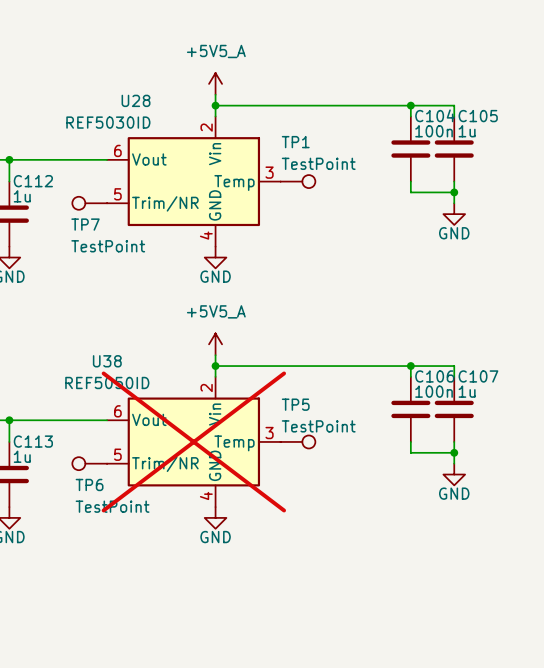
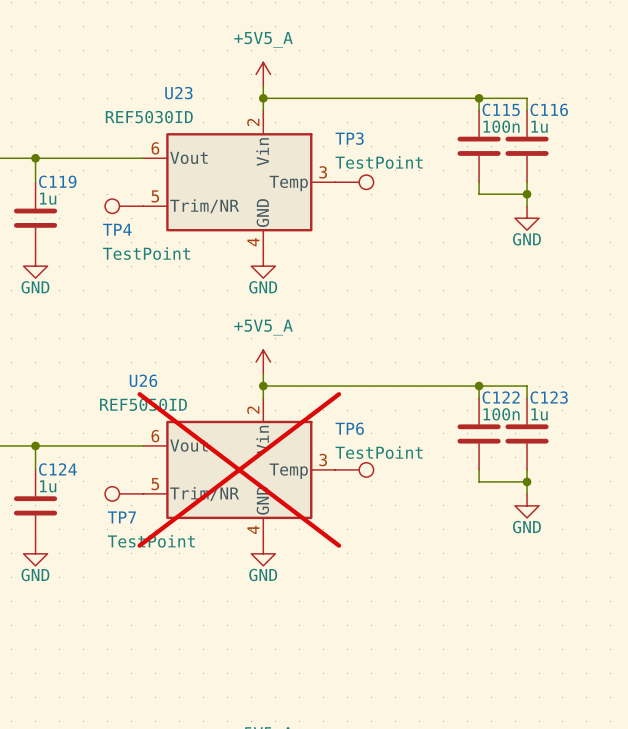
U28 name: U28 (136, 100) -> U23 (178, 93)
C104 name: C104 (435, 115) -> C115 (501, 109)
C105 name: C105 (478, 116) -> C116 (549, 109)
TP1 name: TP1 (295, 142) -> TP3 (349, 138)
C112 name: C112 (33, 181) -> C119 (57, 181)
TP7 name: TP7 (85, 224) -> TP4 (117, 229)
U38 name: U38 (107, 361) -> U26 (143, 380)
C106 name: C106 (434, 376) -> C122 (501, 397)
C107 name: C107 (478, 376) -> C123 (549, 397)
TP5 name: TP5 (295, 404) -> TP6 (349, 428)
C113 name: C113 (33, 441) -> C124 (57, 469)
TP6 name: TP6 (89, 484) -> TP7 (121, 517)

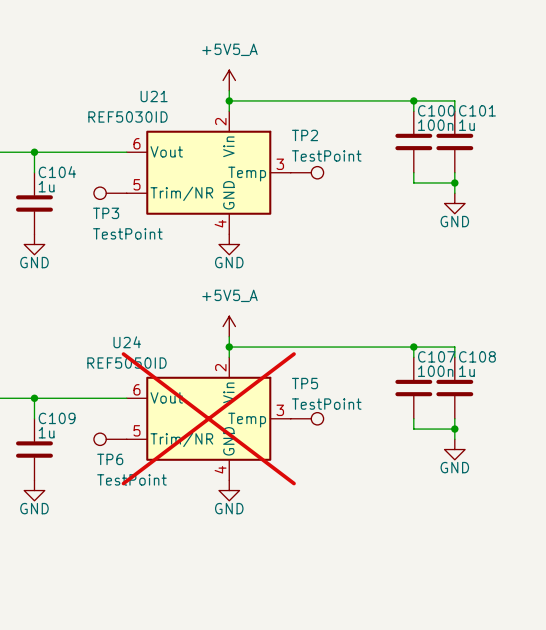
U23 name: U23 (178, 93) -> U21 (154, 96)
C115 name: C115 (501, 109) -> C100 (436, 110)
C116 name: C116 (549, 109) -> C101 (477, 110)
TP3 name: TP3 (349, 138) -> TP2 (305, 135)
C119 name: C119 (57, 181) -> C104 (57, 172)
TP4 name: TP4 (117, 229) -> TP3 (106, 213)
U26 name: U26 (143, 380) -> U24 (127, 342)
C122 name: C122 (501, 397) -> C107 (436, 356)
C123 name: C123 (549, 397) -> C108 (477, 356)
TP6 name: TP6 (349, 428) -> TP5 (305, 383)
C124 name: C124 (57, 469) -> C109 (57, 418)
TP7 name: TP7 (121, 517) -> TP6 (110, 459)

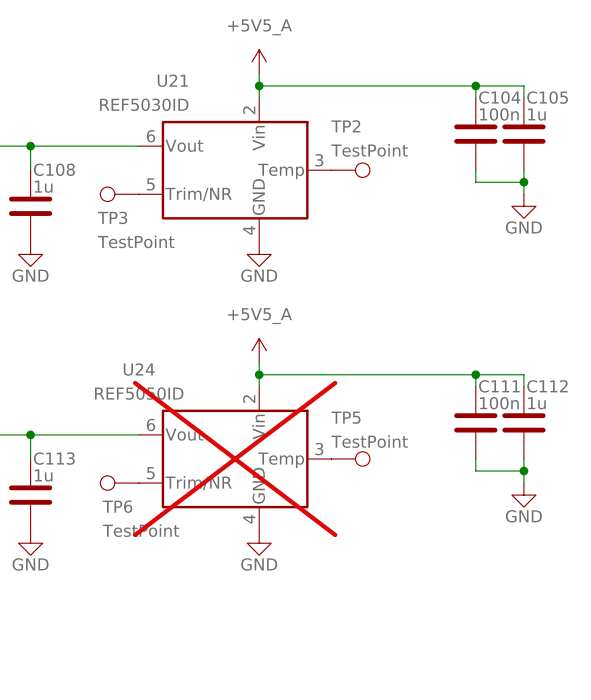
C100 name: C100 (436, 110) -> C104 (499, 97)
C101 name: C101 (477, 110) -> C105 (547, 97)
C104 name: C104 (57, 172) -> C108 (54, 169)
C107 name: C107 (436, 356) -> C111 (499, 386)
C108 name: C108 (477, 356) -> C112 (547, 386)
C109 name: C109 (57, 418) -> C113 (54, 458)

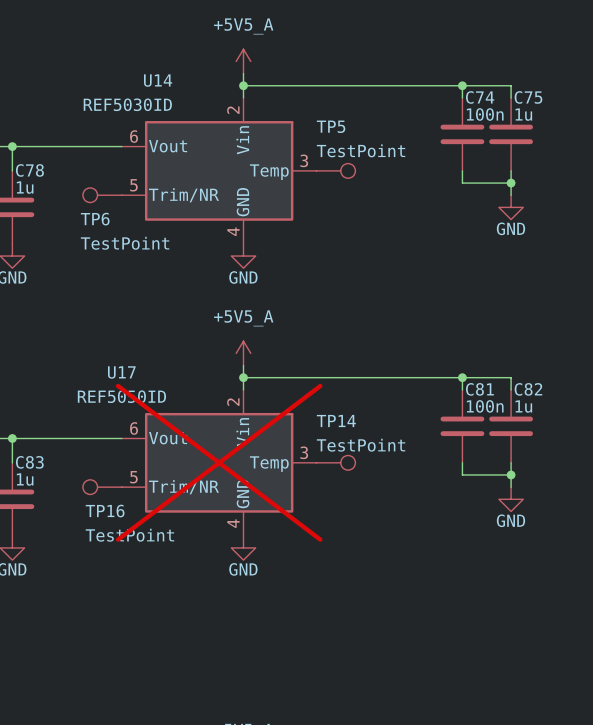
U21 name: U21 (172, 80) -> U14 (158, 80)
C104 name: C104 (499, 97) -> C74 (480, 97)
C105 name: C105 (547, 97) -> C75 (528, 97)
TP2 name: TP2 (345, 126) -> TP5 (331, 126)
C108 name: C108 (54, 169) -> C78 (29, 170)
TP3 name: TP3 (112, 217) -> TP6 (95, 219)
U24 name: U24 (139, 369) -> U17 (121, 372)
C111 name: C111 (499, 386) -> C81 (479, 389)
C112 name: C112 (547, 386) -> C82 (528, 389)
TP5 name: TP5 (345, 417) -> TP14 (336, 421)
C113 name: C113 (54, 458) -> C83 (29, 462)
TP6 name: TP6 (117, 506) -> TP16 (105, 511)

